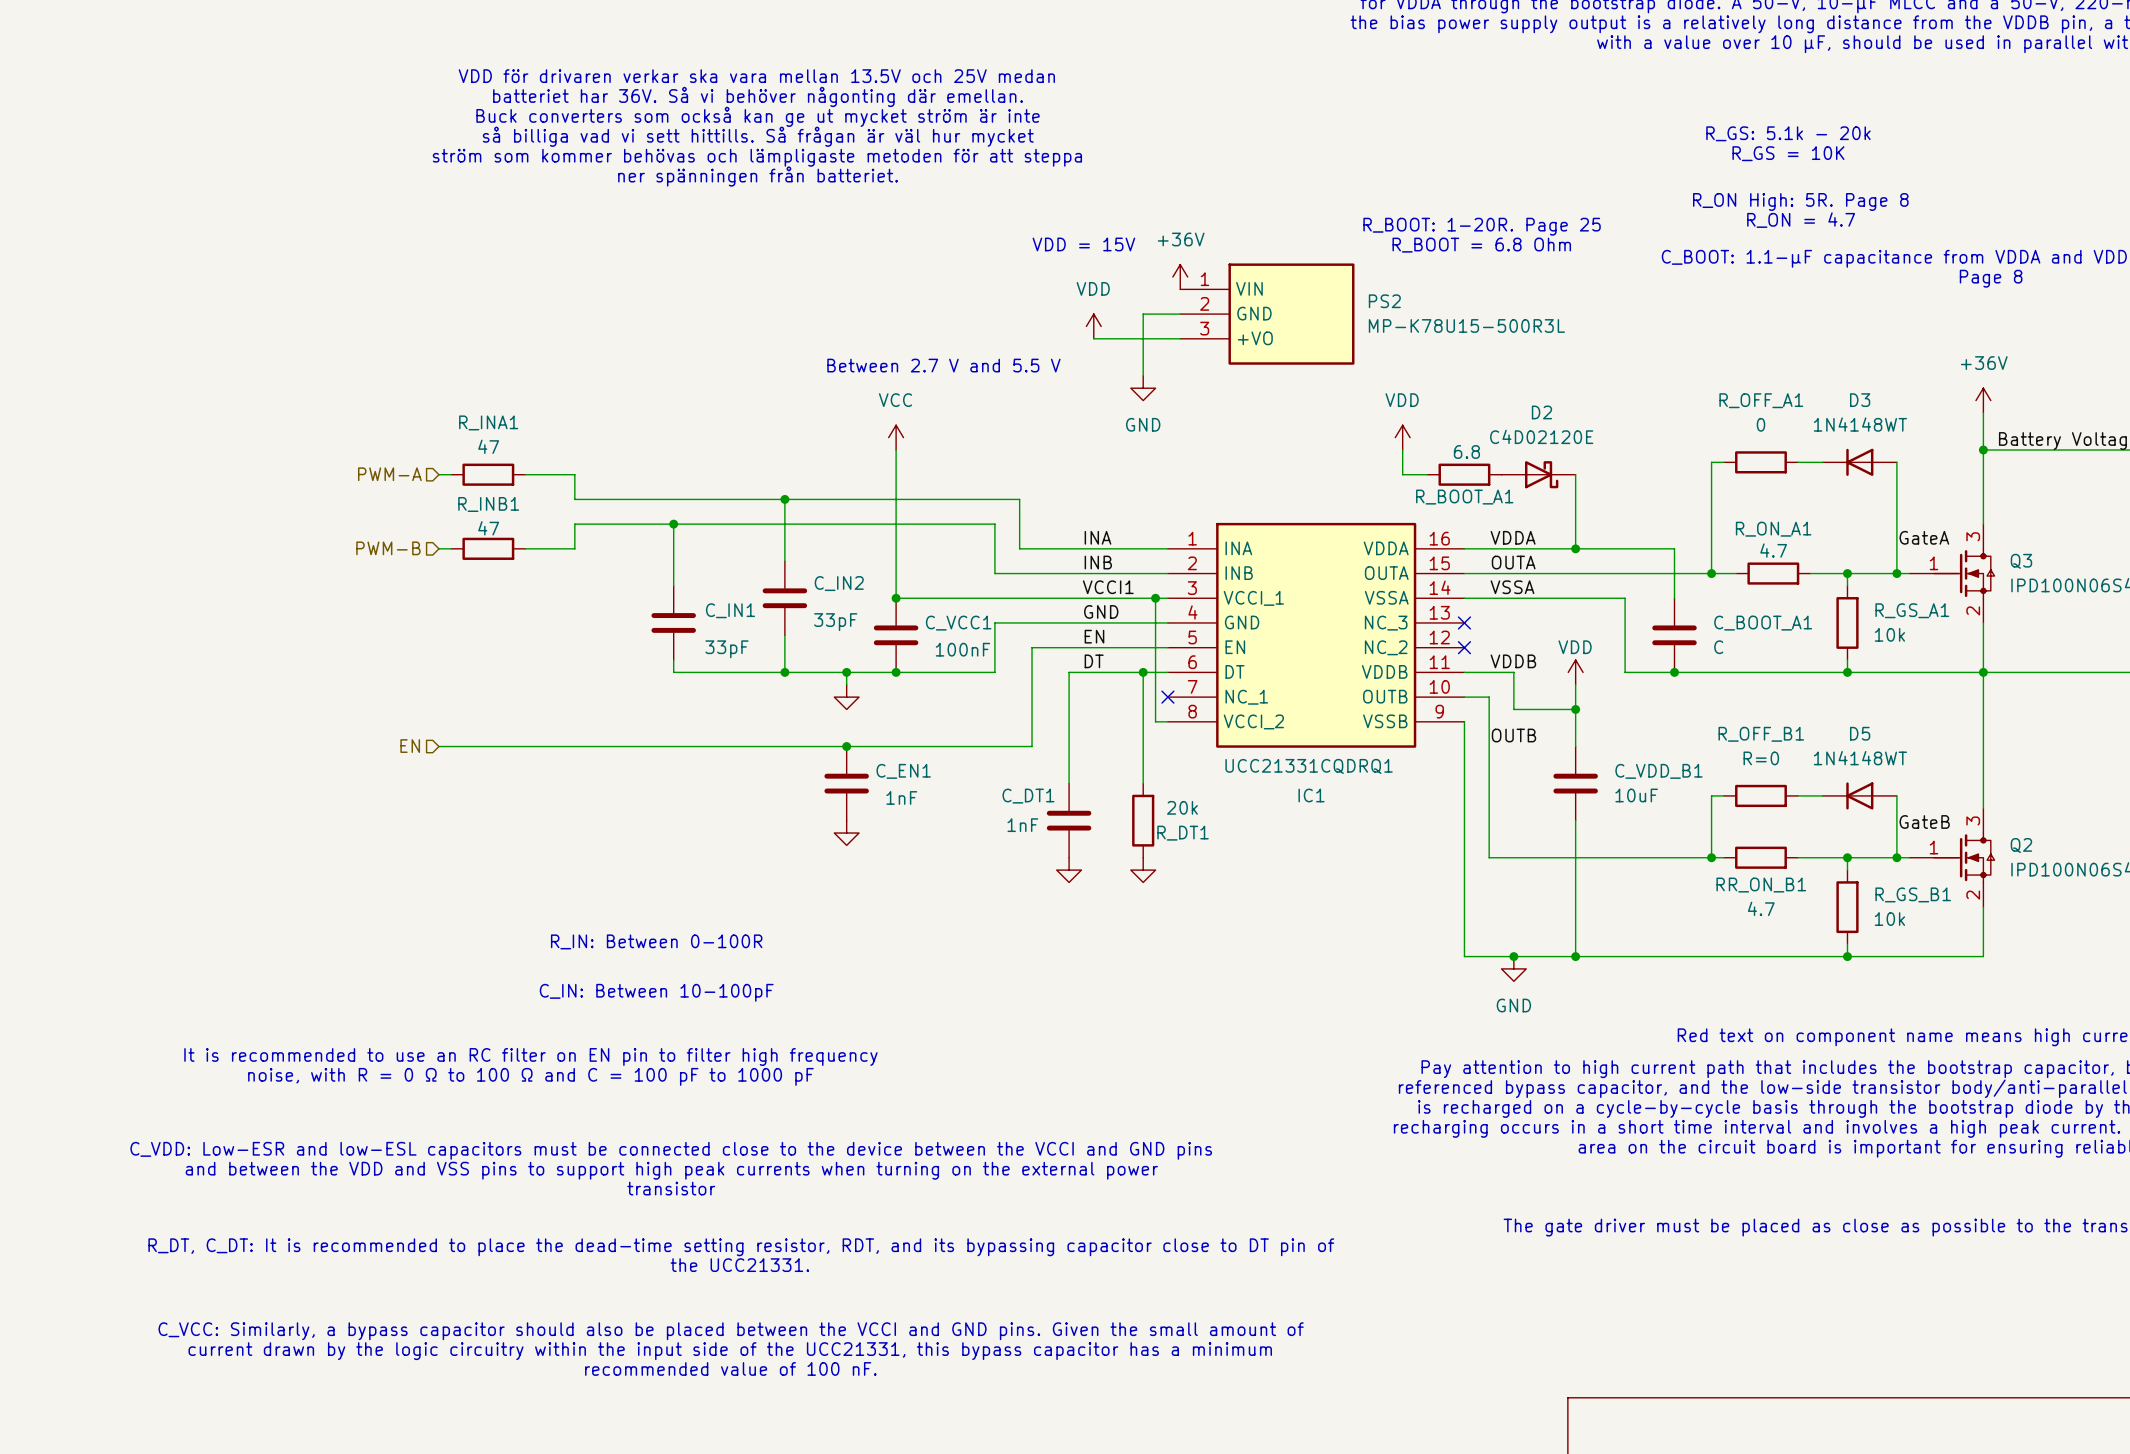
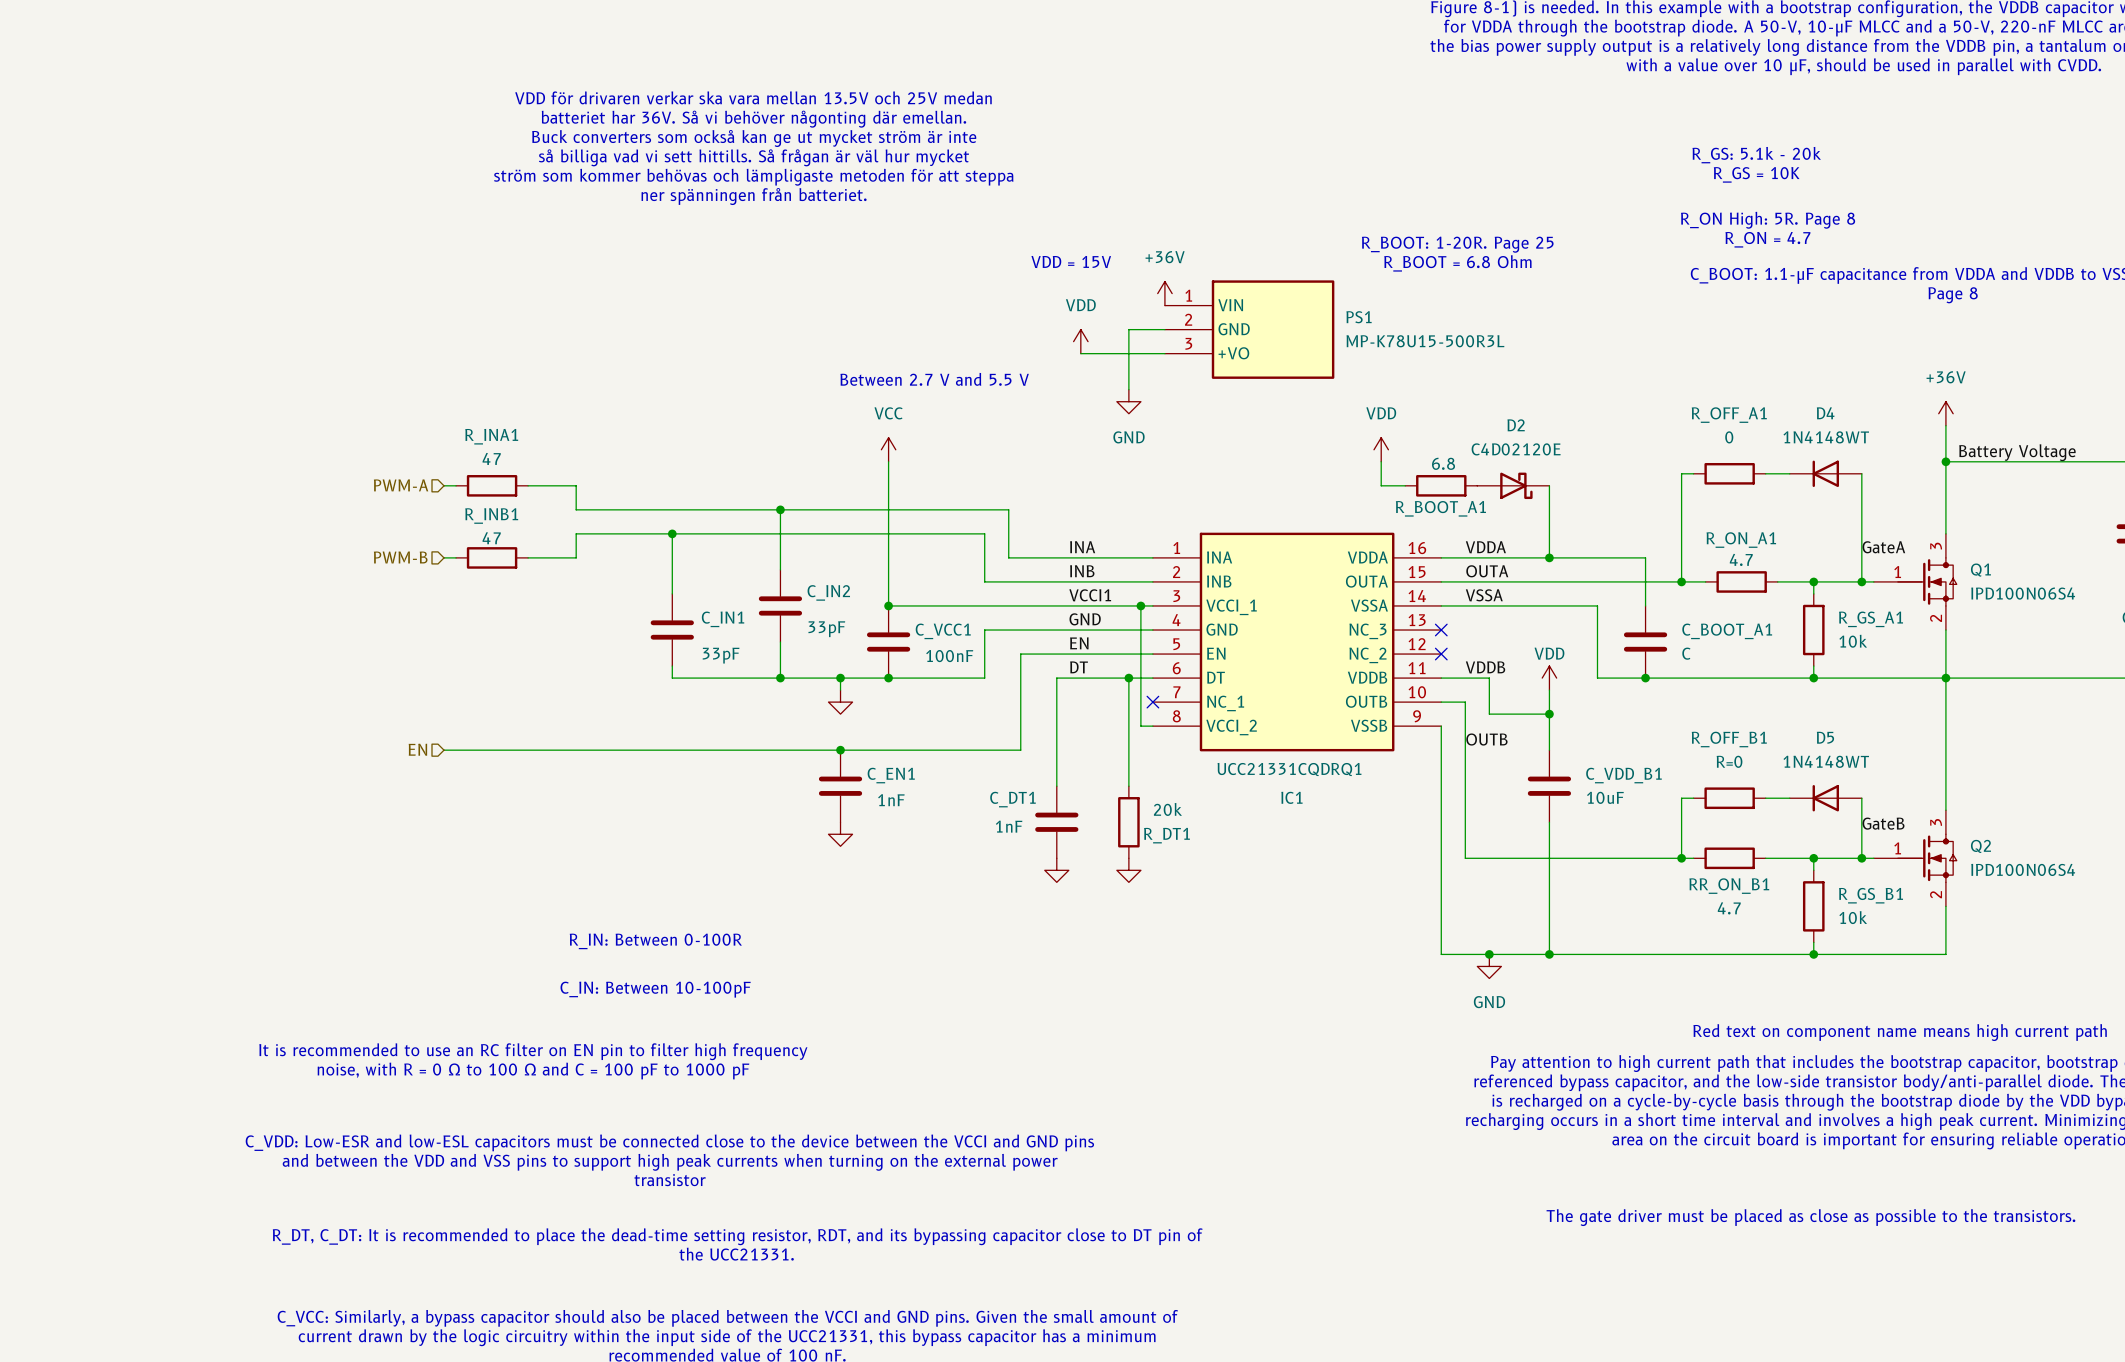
PS2 name: PS2 (1384, 301) -> PS1 (1359, 317)
D3 name: D3 (1860, 400) -> D4 (1825, 413)
Q3 name: Q3 (2021, 561) -> Q1 (1980, 570)

